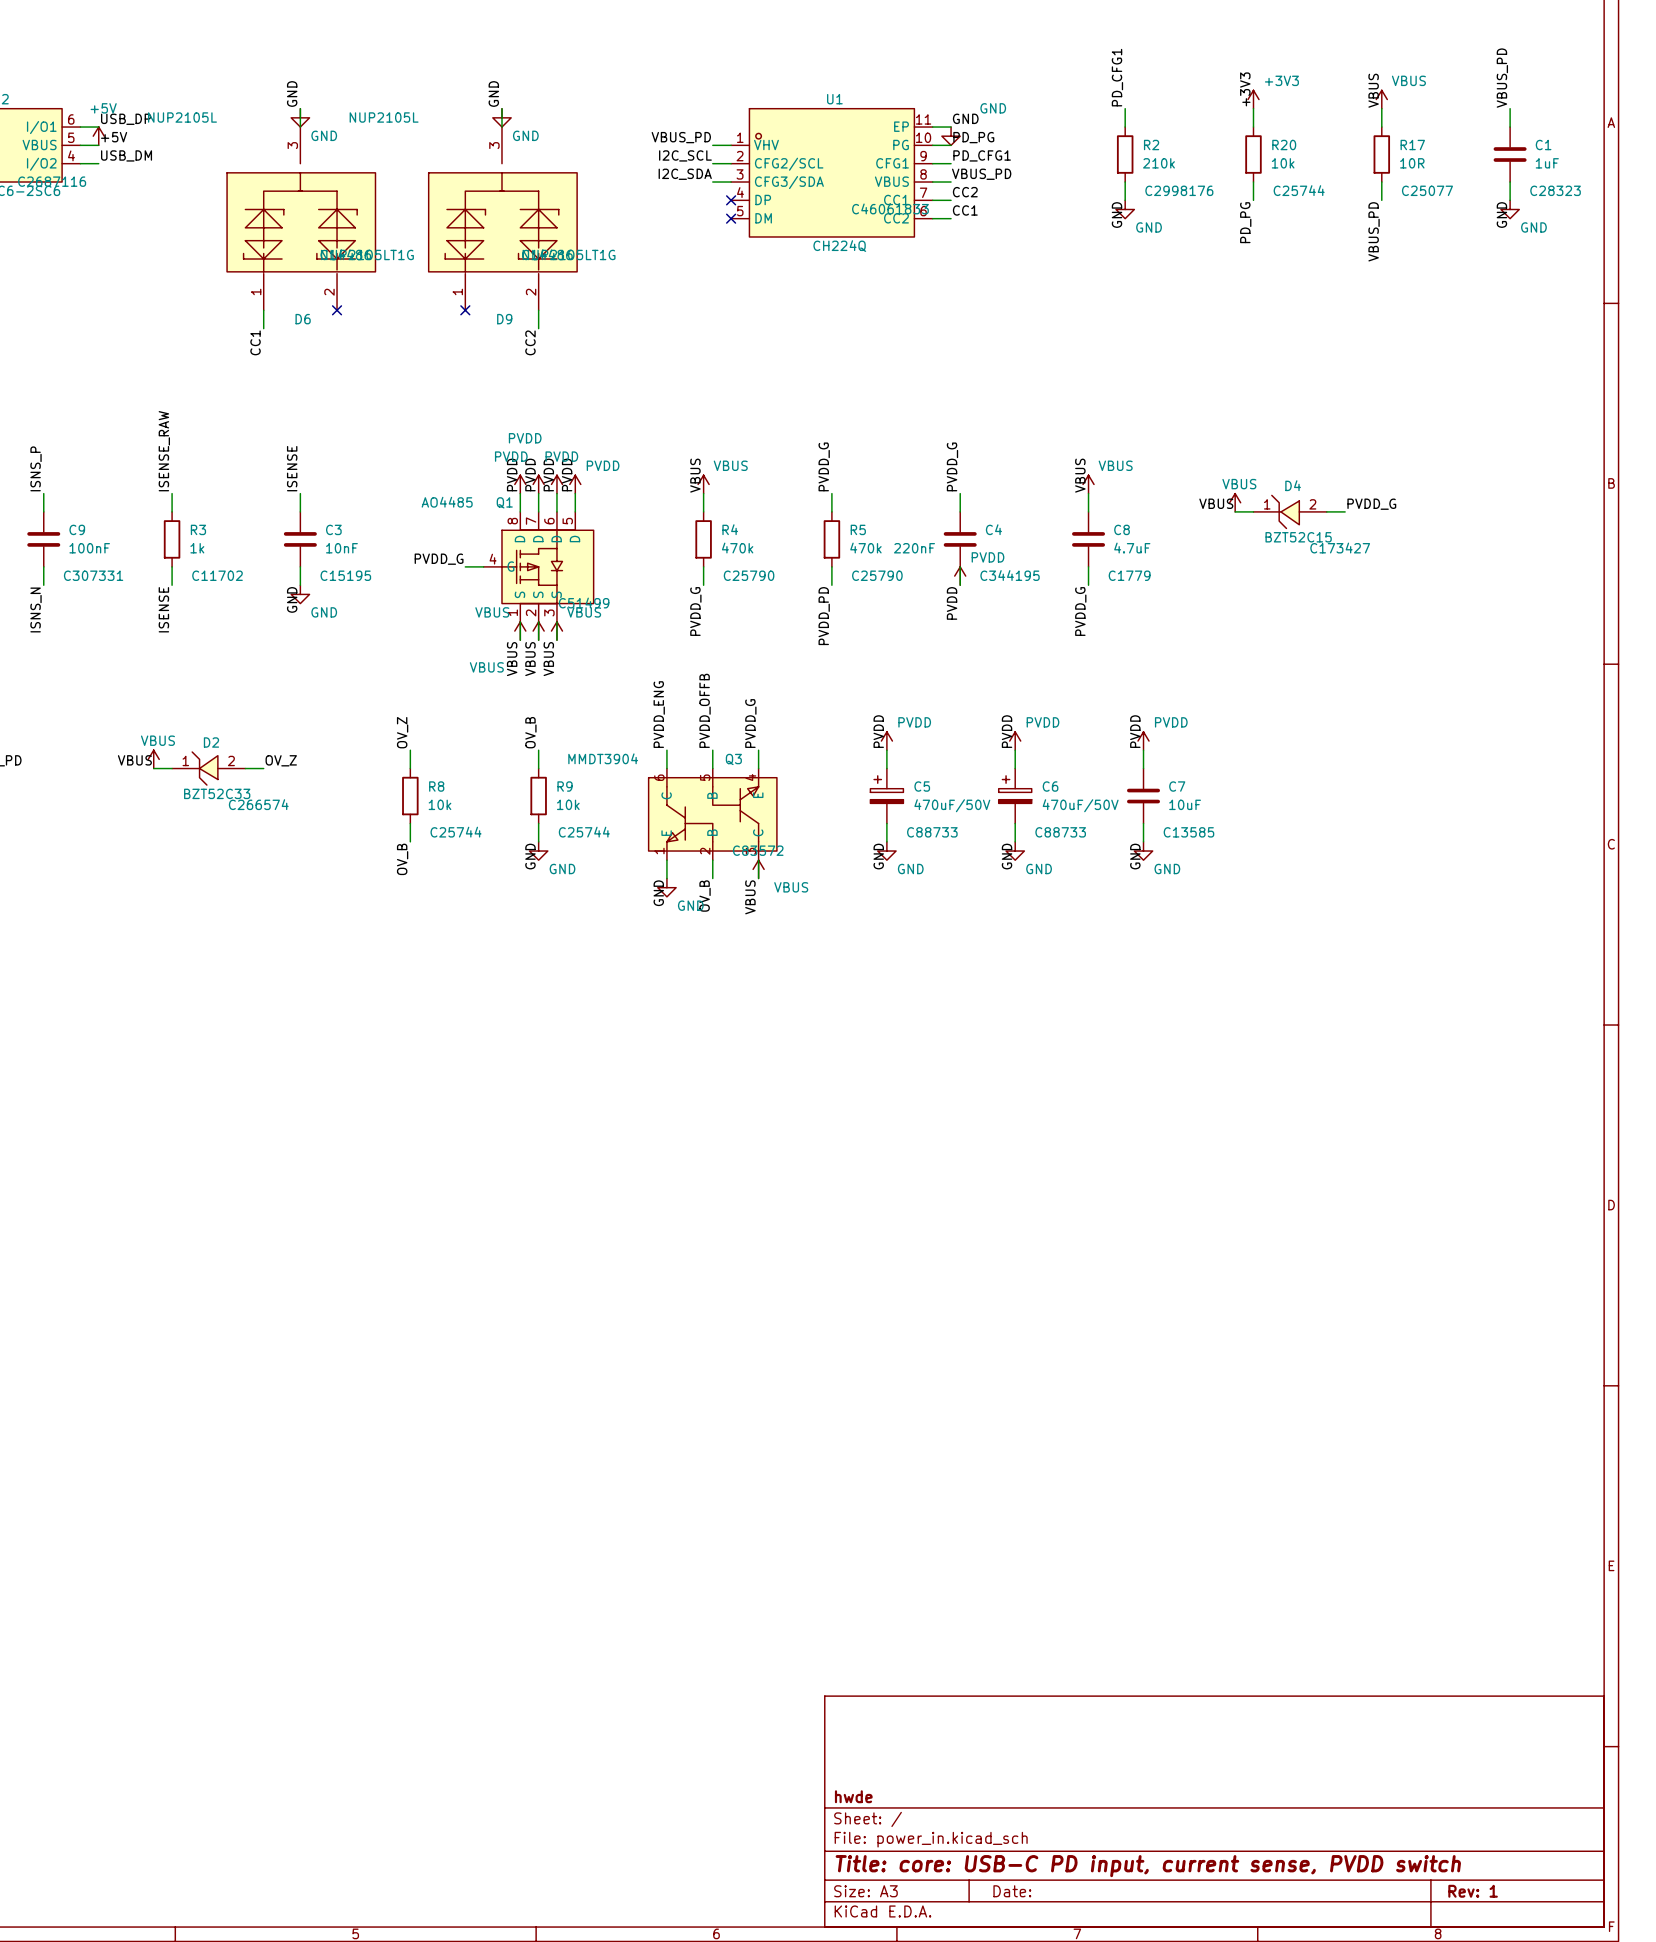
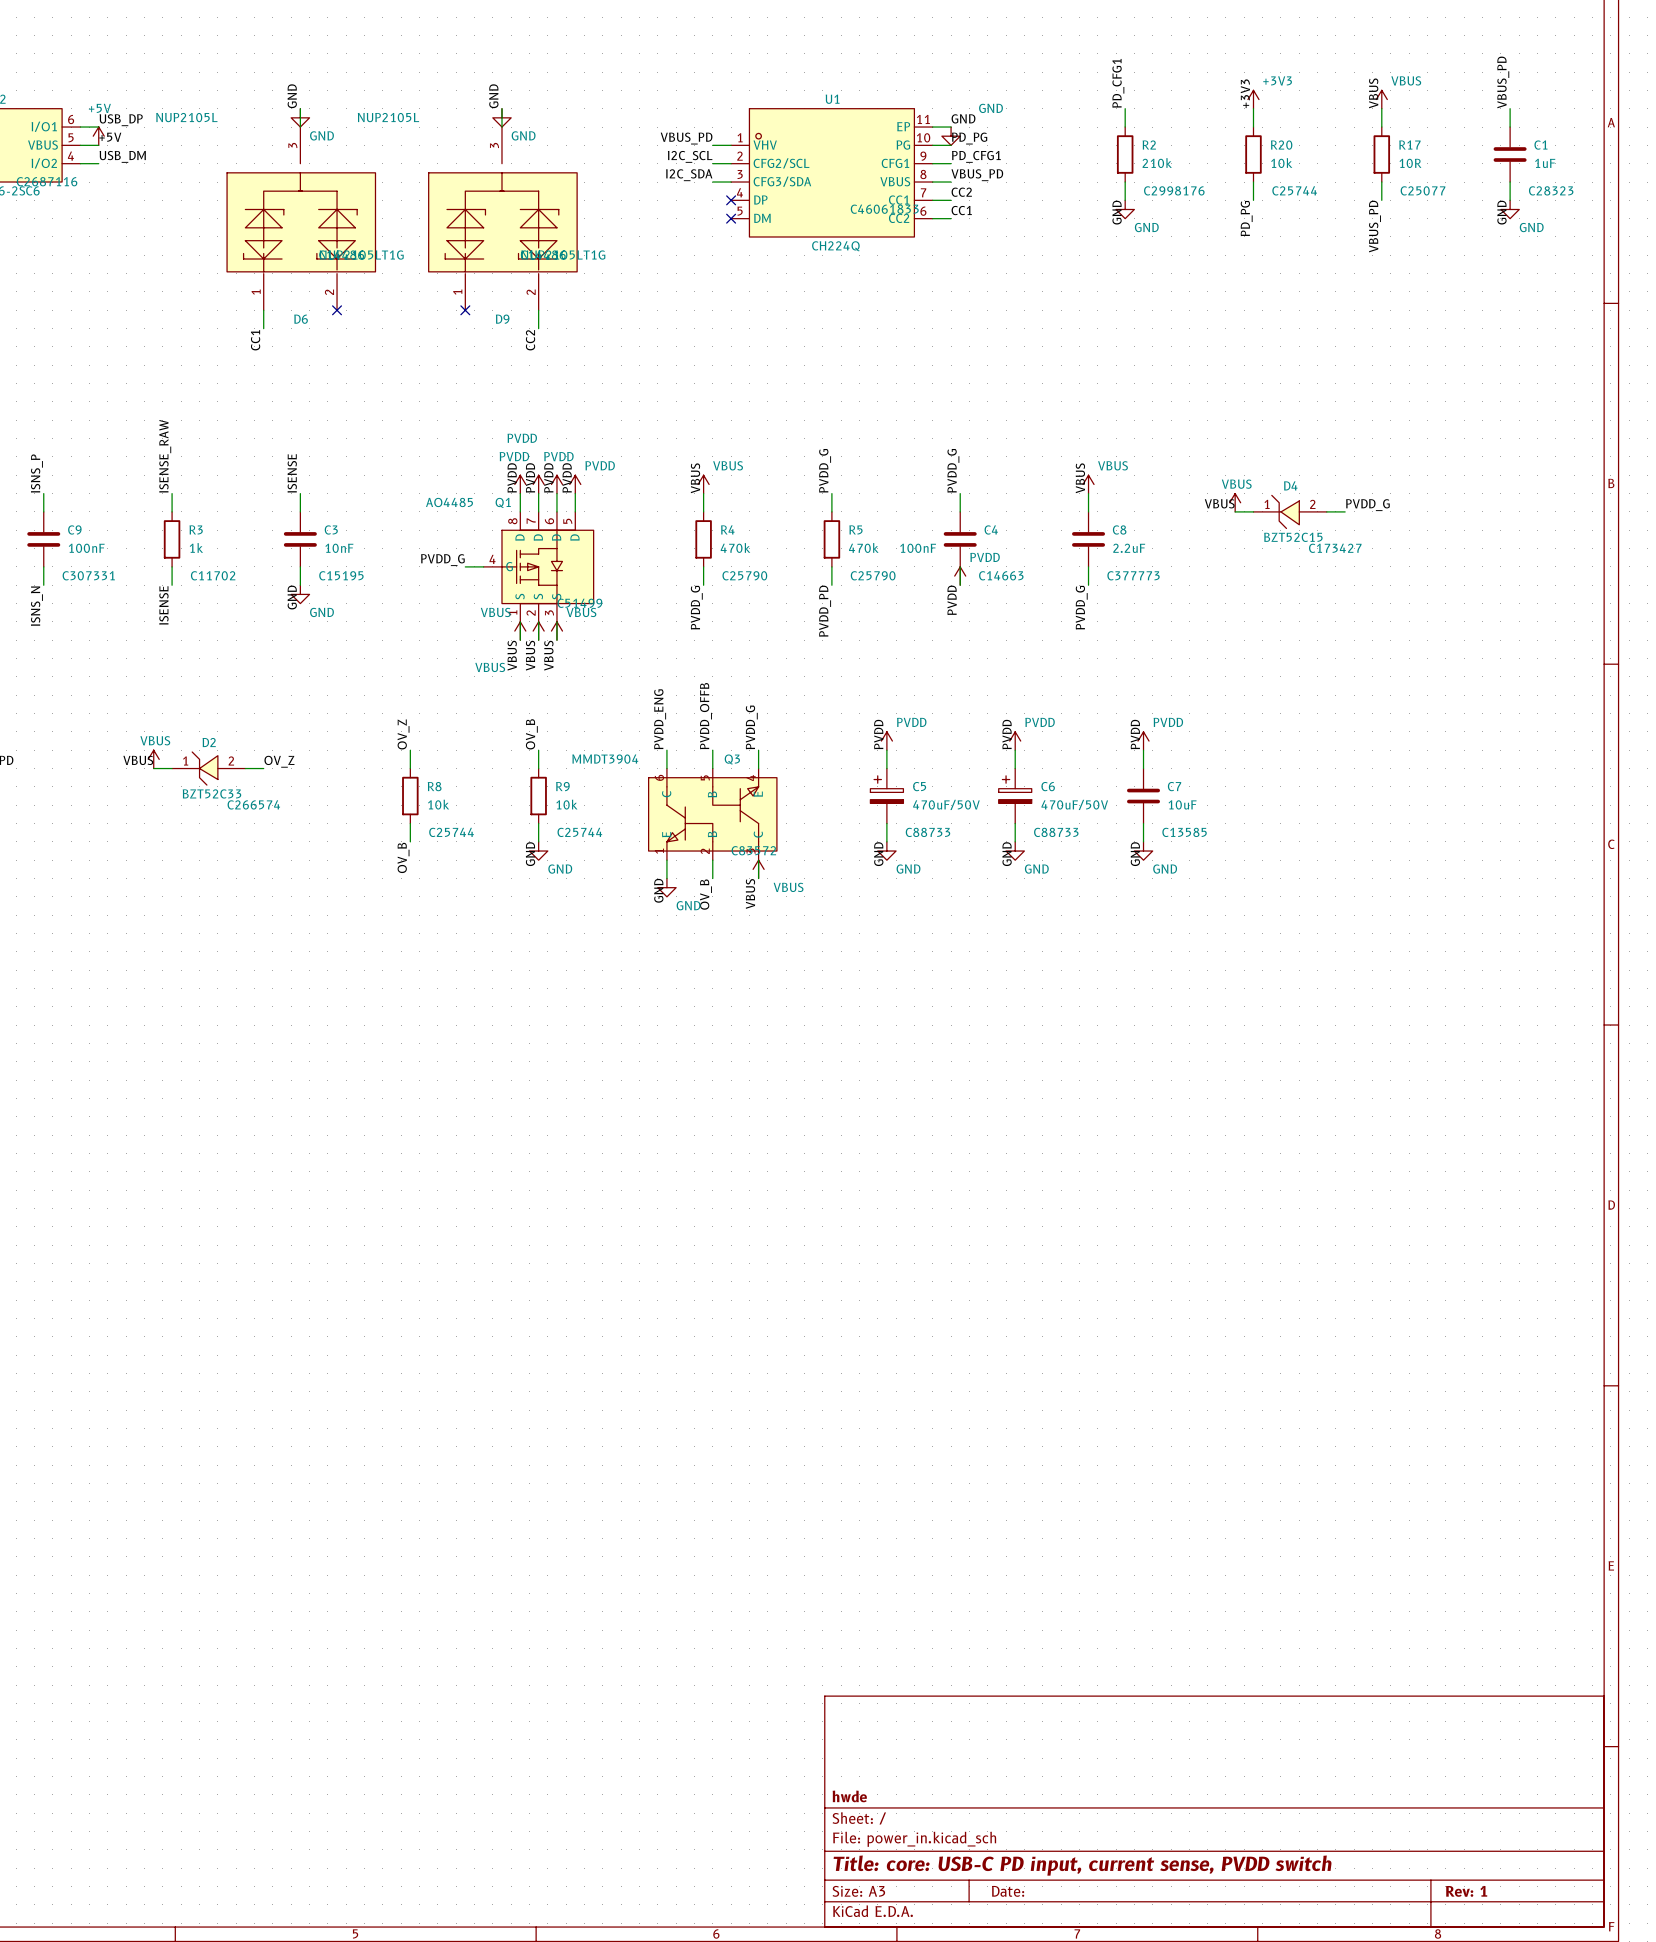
C4 value: 220nF (914, 548) -> 100nF (918, 548)
C8 value: 4.7uF (1132, 548) -> 2.2uF (1129, 548)
C4 text: C344195 (1010, 575) -> C14663 (1001, 575)
C8 text: C1779 (1129, 575) -> C377773 (1133, 575)

